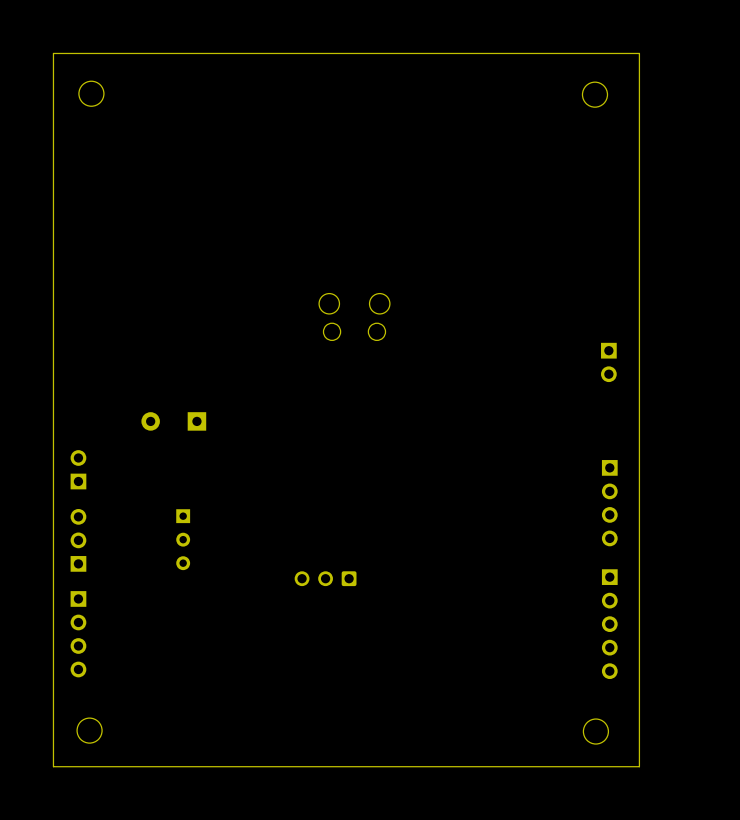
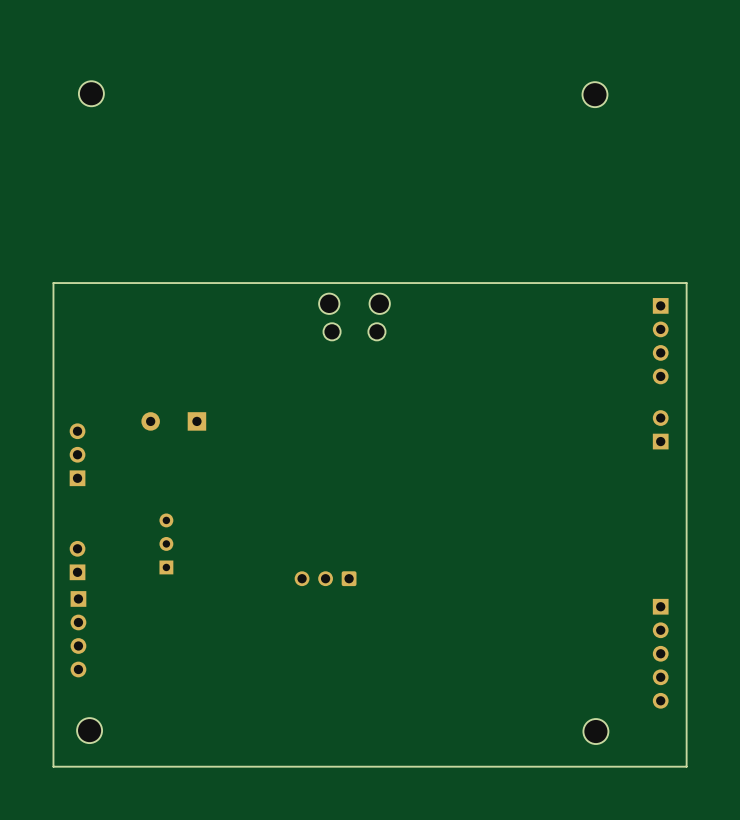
board edge: (53, 283) (53, 53) (639, 53) (639, 766) -> (53, 283) (686, 283) (686, 766) (639, 766)
part rotation: 0° (608, 362) -> 180° (660, 429)
part position: (608, 362) -> (660, 429)
part position: (78, 469) -> (77, 560)
part position: (609, 503) -> (660, 341)
part rotation: 0° (183, 539) -> 180° (166, 543)
part position: (78, 540) -> (77, 454)
part position: (609, 624) -> (660, 653)

